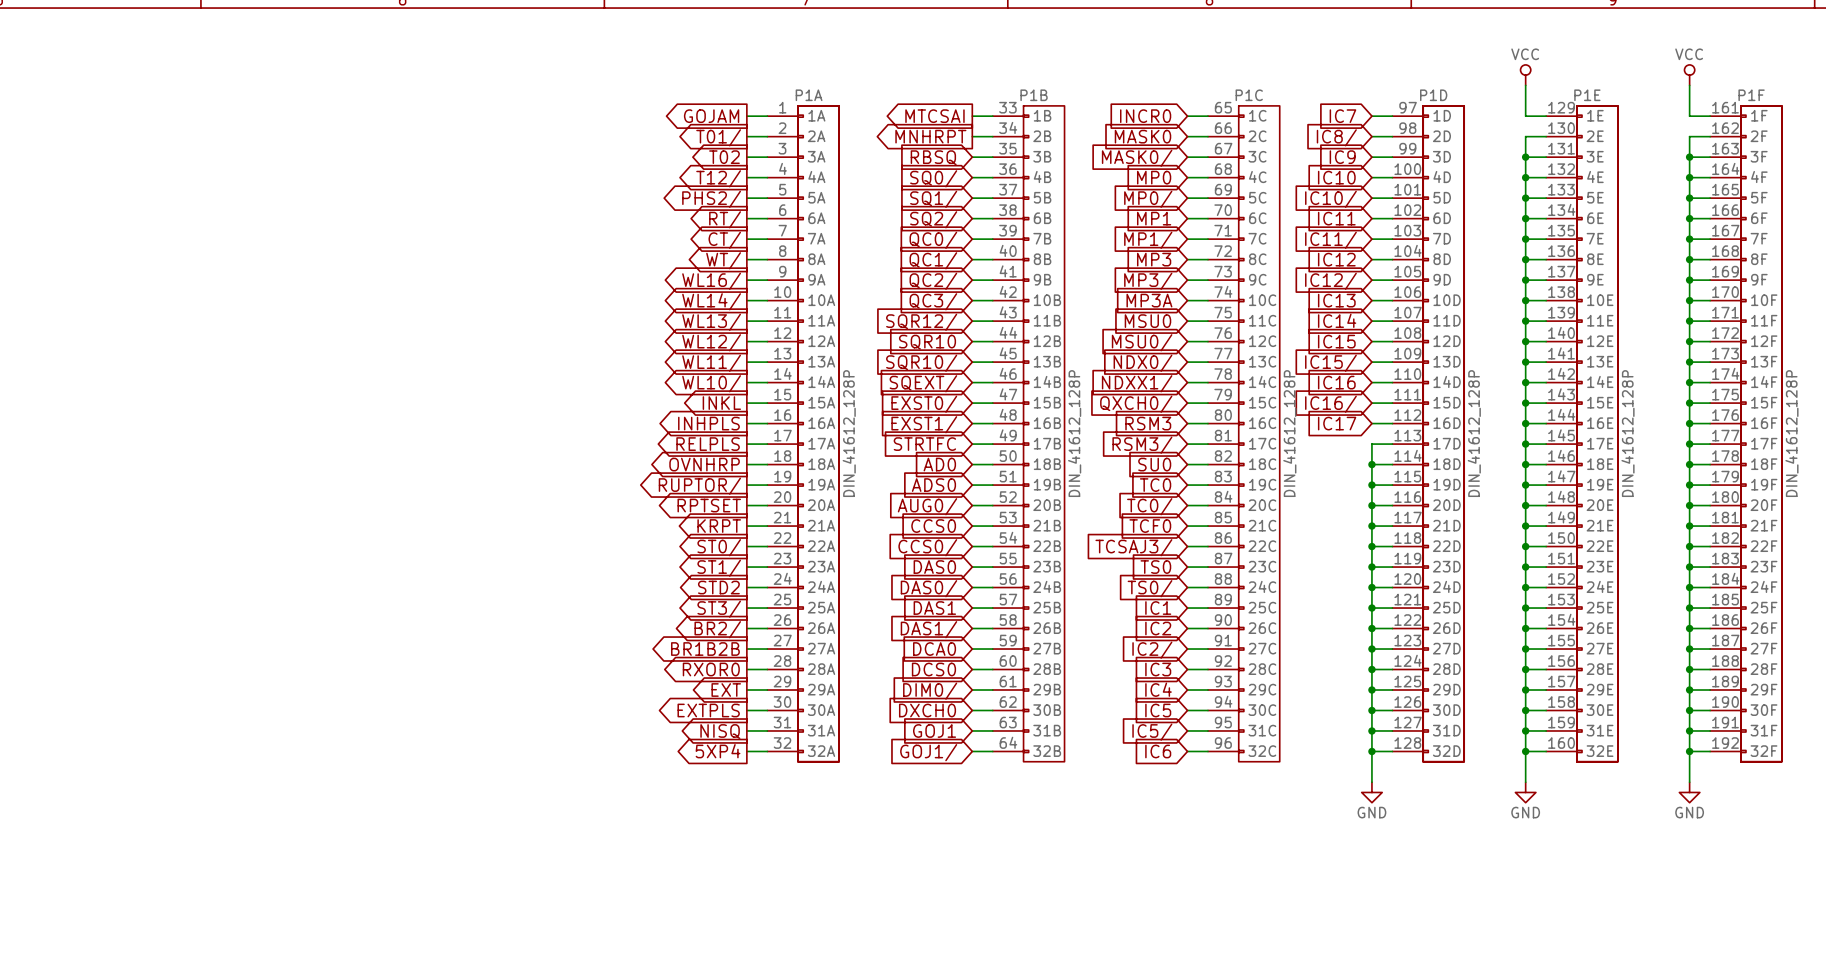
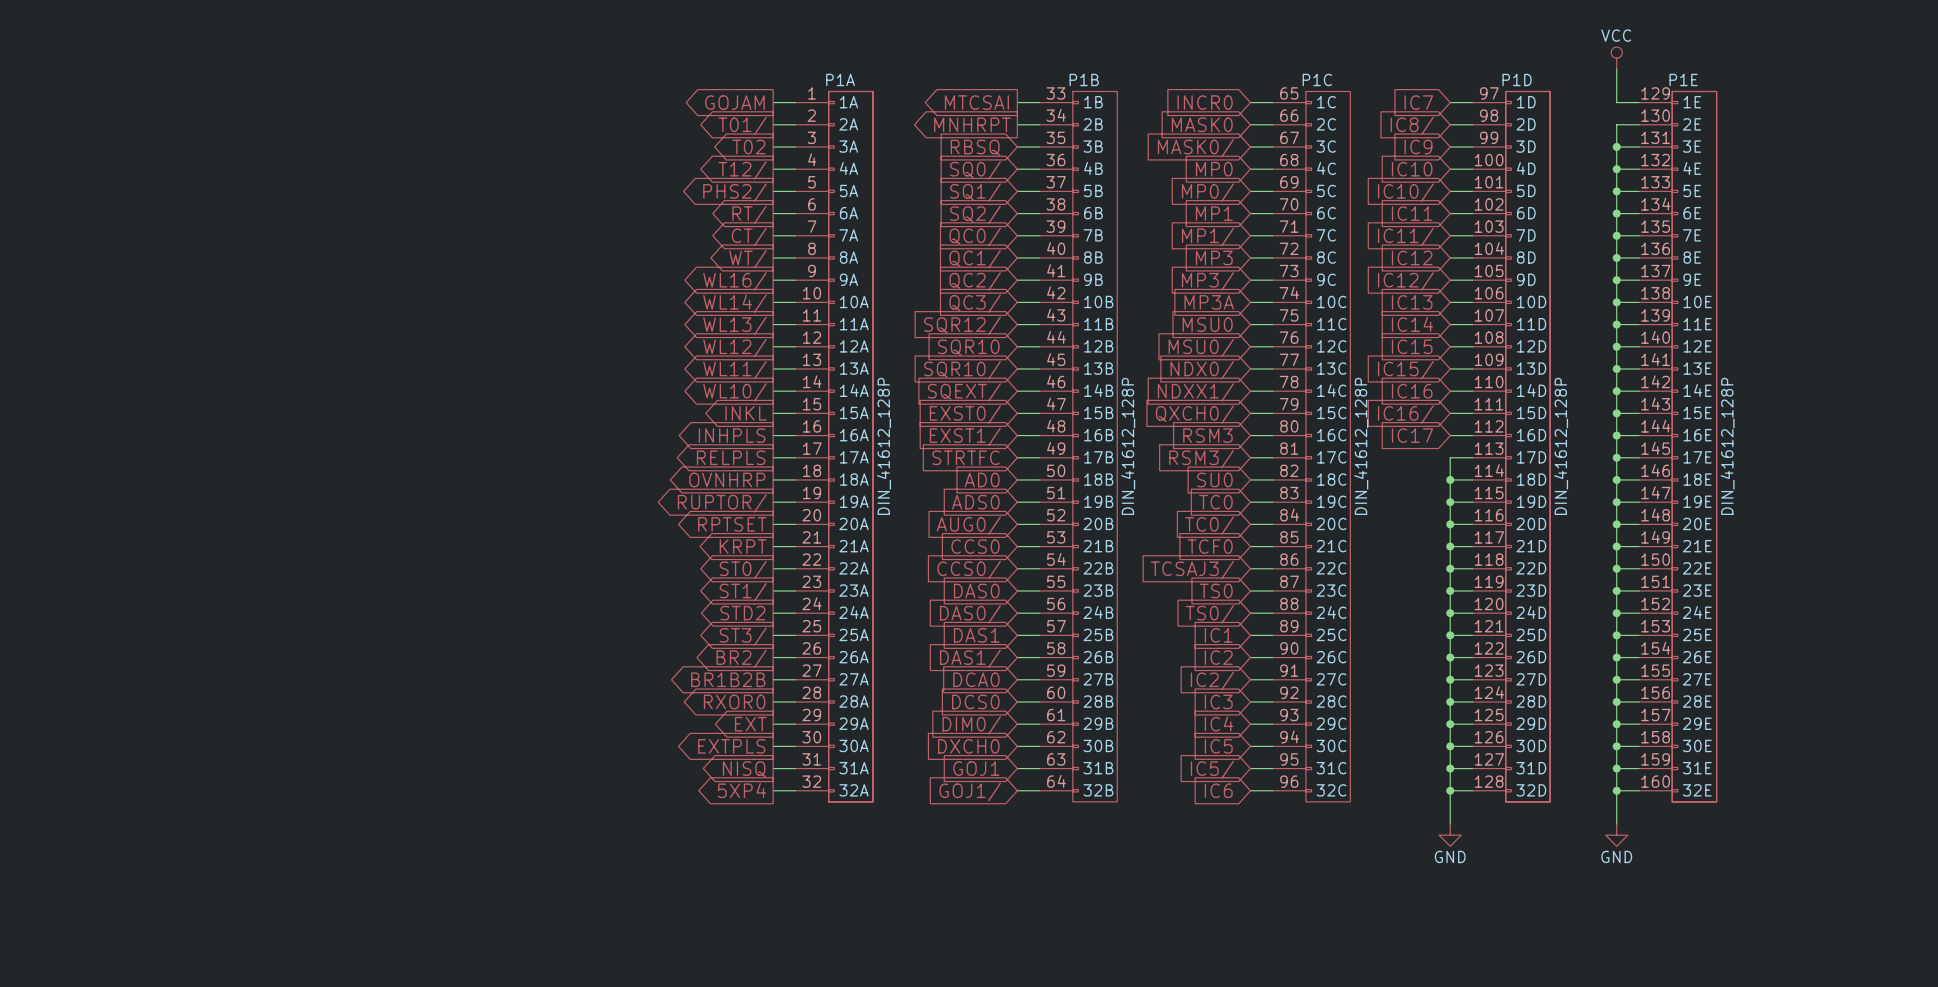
power symbol: VCC (1689, 75) -> none
wire: (1689, 85) (1689, 116) (1710, 116) -> none
wire: (1710, 136) (1689, 136) (1689, 782) -> none
wire: (1689, 157) (1710, 157) -> none
junction: (1689, 157) -> none
wire: (1689, 177) (1710, 177) -> none
junction: (1689, 177) -> none
wire: (1689, 198) (1710, 198) -> none
junction: (1689, 198) -> none
wire: (1689, 218) (1710, 218) -> none
junction: (1689, 218) -> none
wire: (1689, 239) (1710, 239) -> none
junction: (1689, 239) -> none
wire: (1689, 259) (1710, 259) -> none
junction: (1689, 259) -> none
wire: (1689, 280) (1710, 280) -> none
junction: (1689, 280) -> none
wire: (1689, 300) (1710, 300) -> none
junction: (1689, 300) -> none
wire: (1689, 321) (1710, 321) -> none
junction: (1689, 321) -> none
wire: (1689, 341) (1710, 341) -> none
junction: (1689, 341) -> none
wire: (1689, 362) (1710, 362) -> none
junction: (1689, 362) -> none
wire: (1689, 382) (1710, 382) -> none
junction: (1689, 382) -> none
wire: (1689, 403) (1710, 403) -> none
junction: (1689, 403) -> none
wire: (1689, 423) (1710, 423) -> none
junction: (1689, 423) -> none
P1F: DIN_41612_128P (1745, 433) -> none
wire: (1689, 444) (1710, 444) -> none
junction: (1689, 444) -> none
wire: (1689, 464) (1710, 464) -> none
junction: (1689, 464) -> none
wire: (1689, 485) (1710, 485) -> none
junction: (1689, 485) -> none
wire: (1689, 505) (1710, 505) -> none
junction: (1689, 505) -> none
wire: (1689, 526) (1710, 526) -> none
junction: (1689, 526) -> none
wire: (1689, 546) (1710, 546) -> none
junction: (1689, 546) -> none
wire: (1689, 567) (1710, 567) -> none
junction: (1689, 567) -> none
wire: (1689, 587) (1710, 587) -> none
junction: (1689, 587) -> none
wire: (1689, 608) (1710, 608) -> none
junction: (1689, 608) -> none
wire: (1689, 628) (1710, 628) -> none
junction: (1689, 628) -> none
wire: (1689, 649) (1710, 649) -> none
junction: (1689, 649) -> none
wire: (1689, 669) (1710, 669) -> none
junction: (1689, 669) -> none
wire: (1689, 690) (1710, 690) -> none
junction: (1689, 690) -> none
wire: (1689, 710) (1710, 710) -> none
junction: (1689, 710) -> none
wire: (1689, 730) (1710, 730) -> none
junction: (1689, 730) -> none
wire: (1689, 751) (1710, 751) -> none
junction: (1689, 751) -> none
power symbol: GND (1689, 792) -> none

